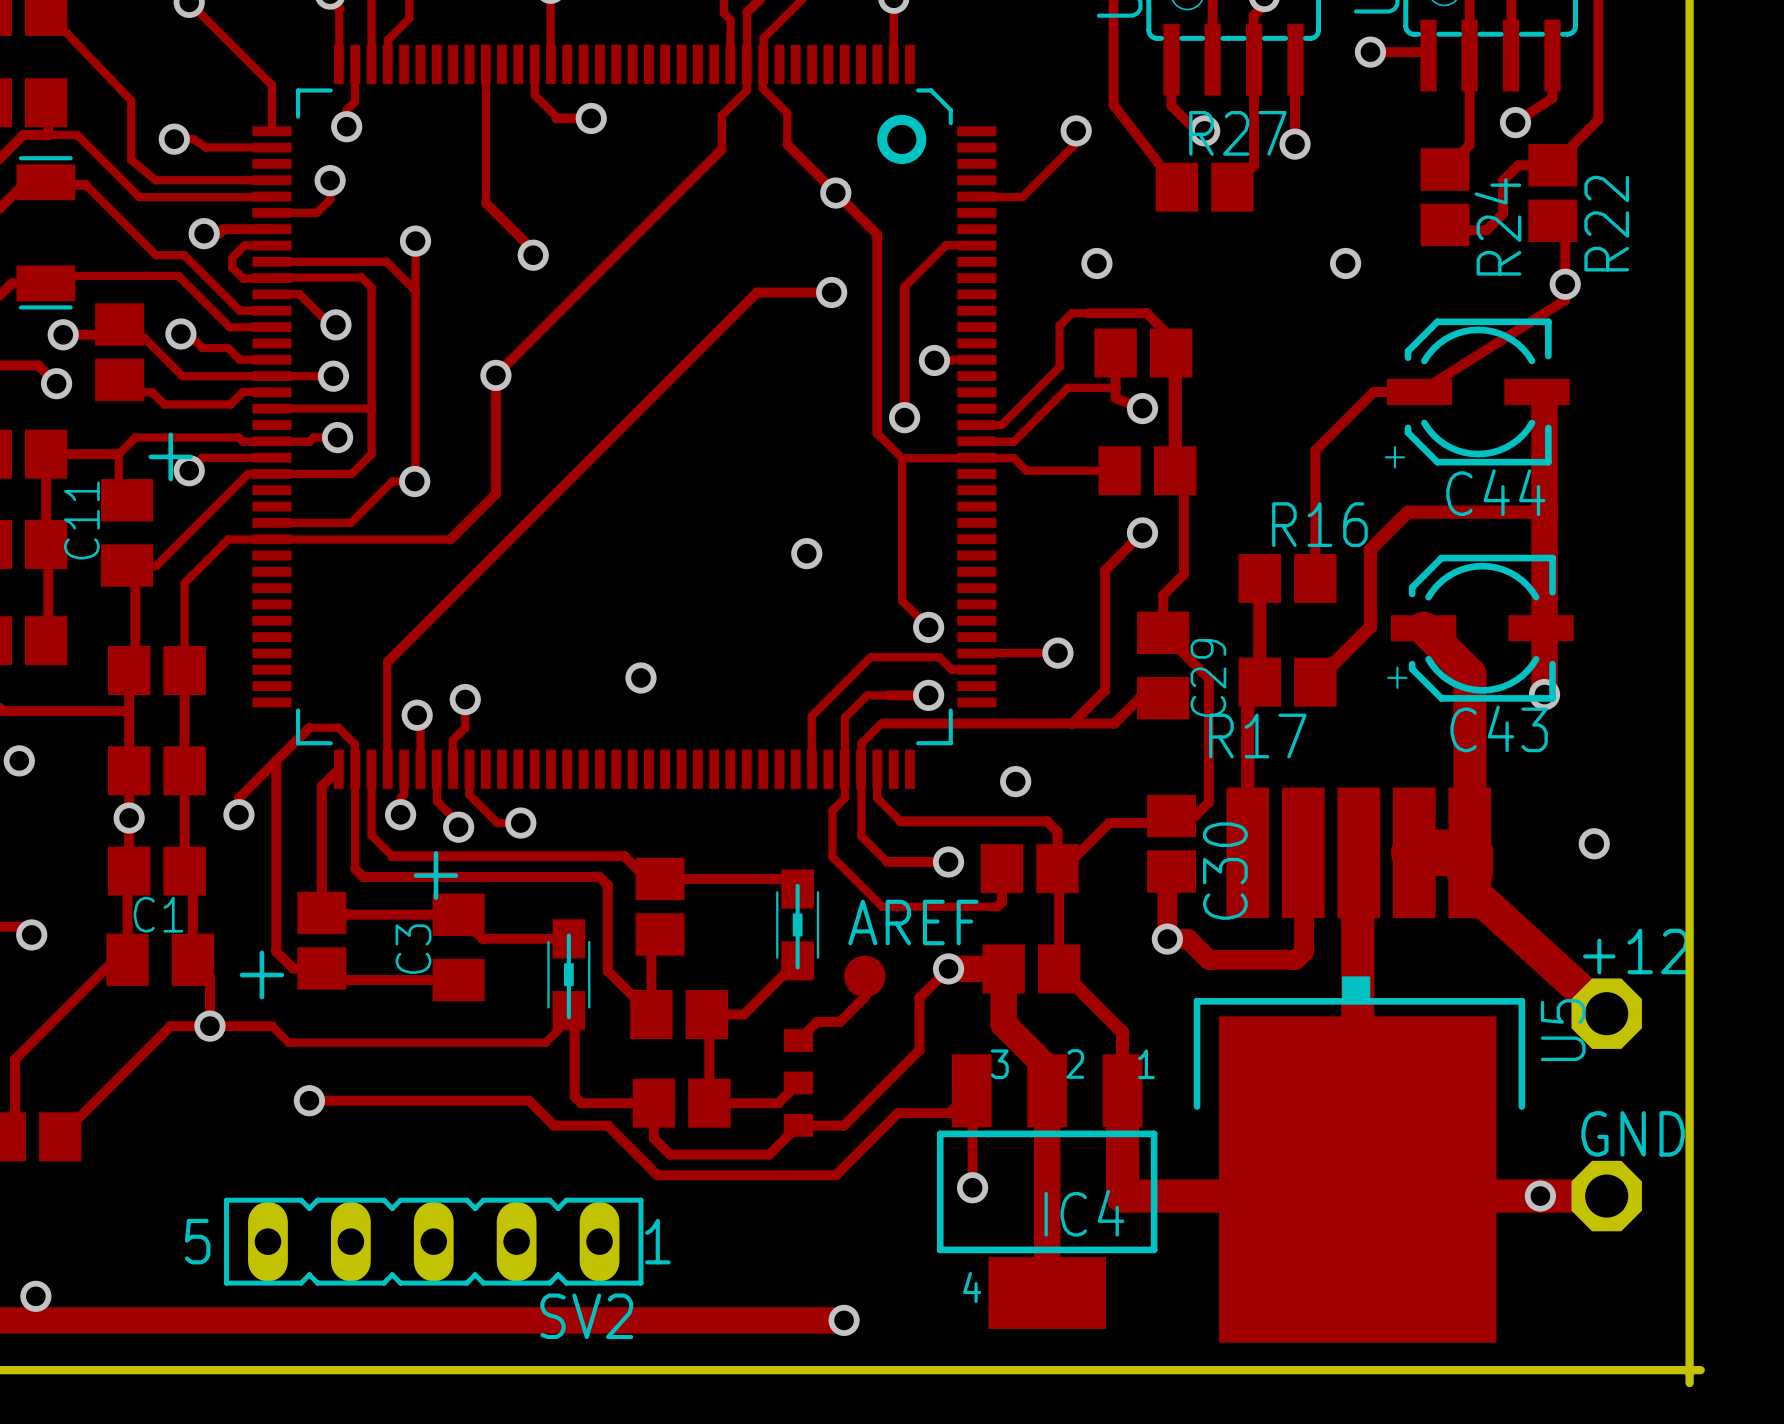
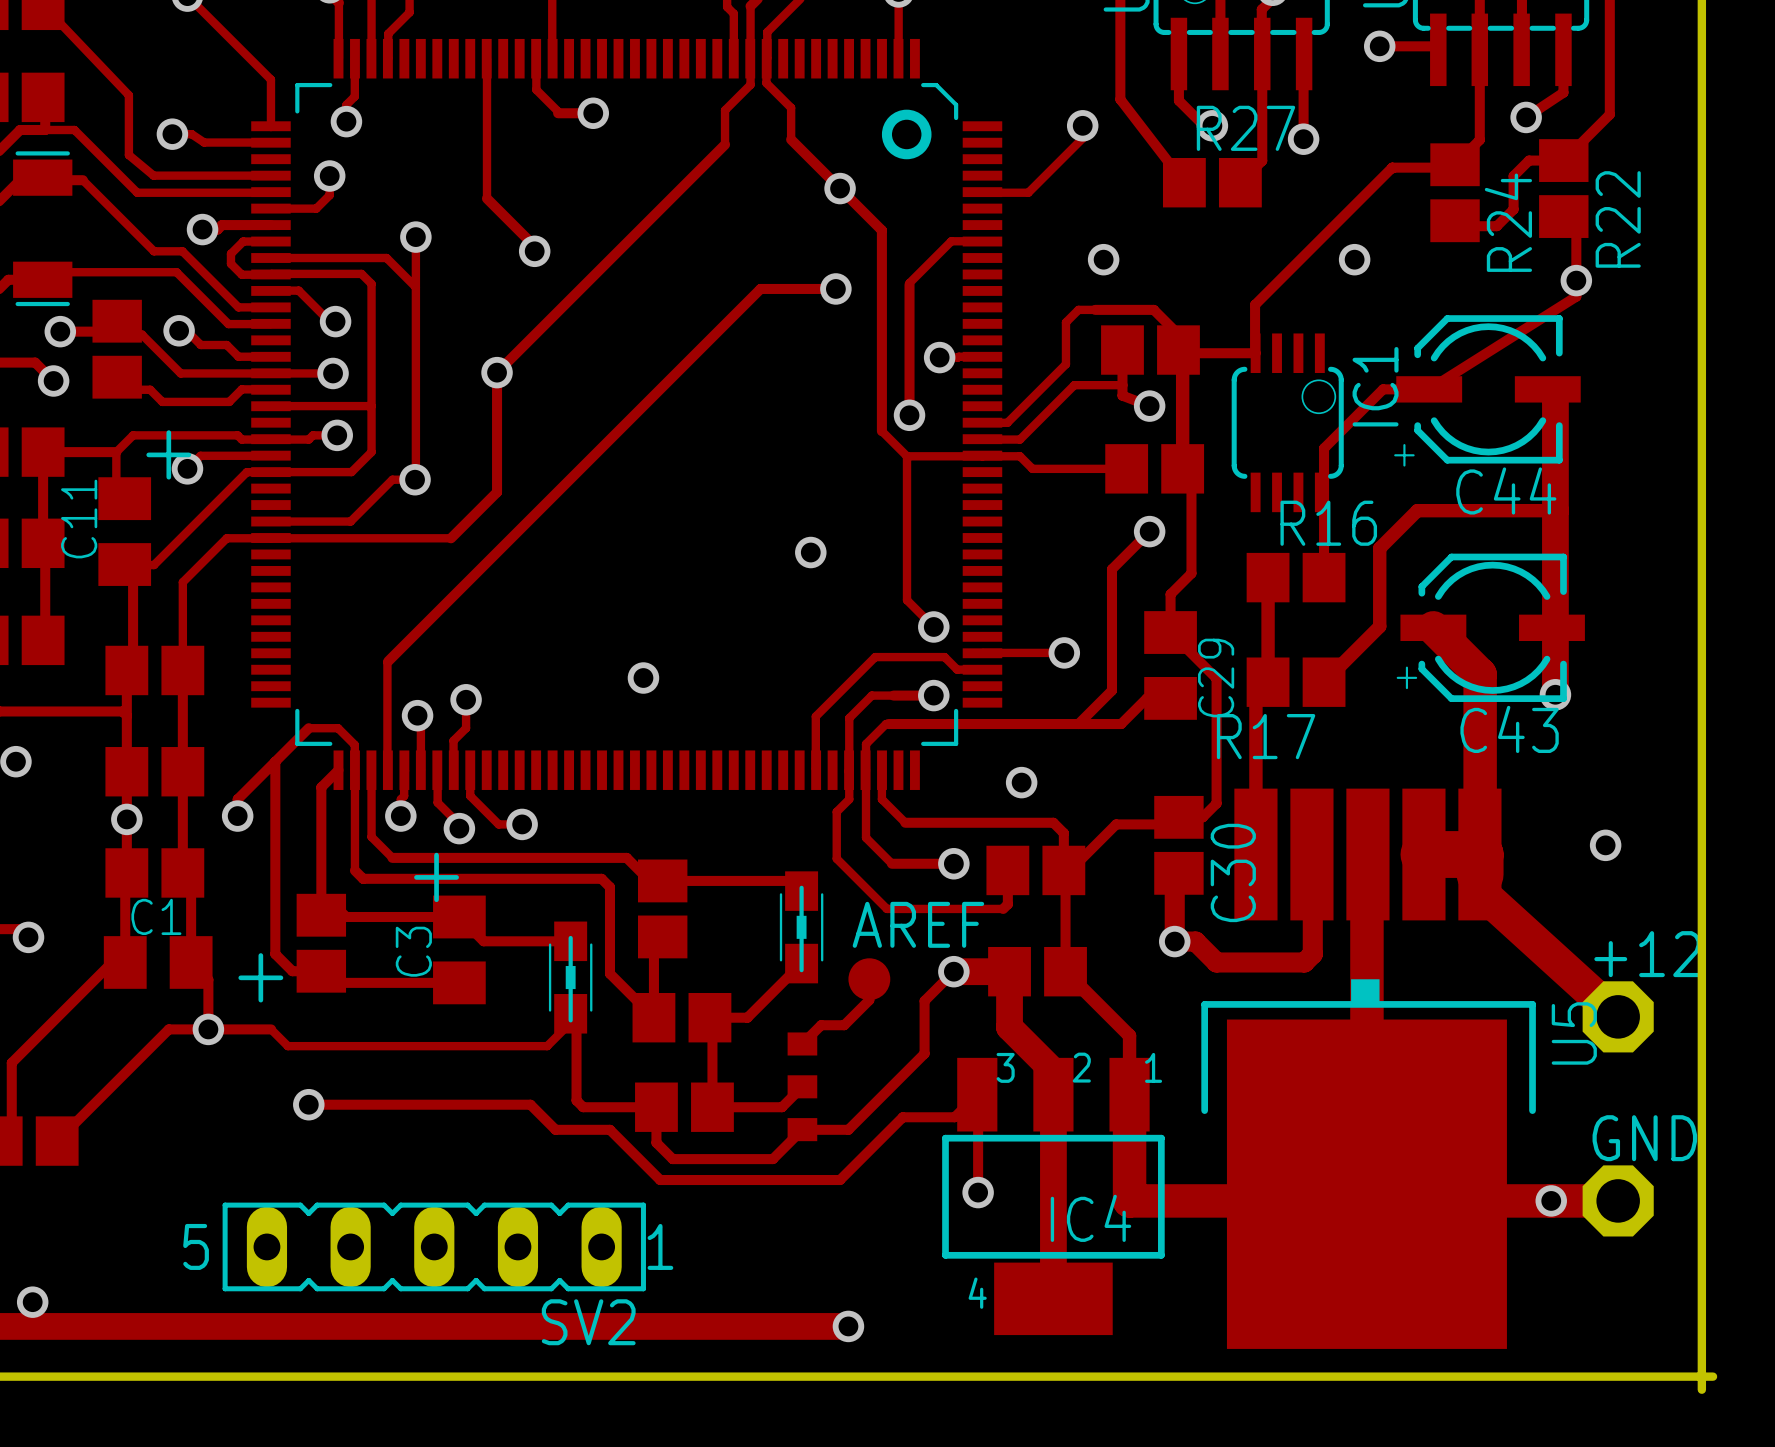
track: none -> (1455, 164) (1452, 167) (1392, 167)
track: none -> (1392, 167) (1255, 304) (1255, 353) (1183, 353)
IC1: none -> (1287, 422)

